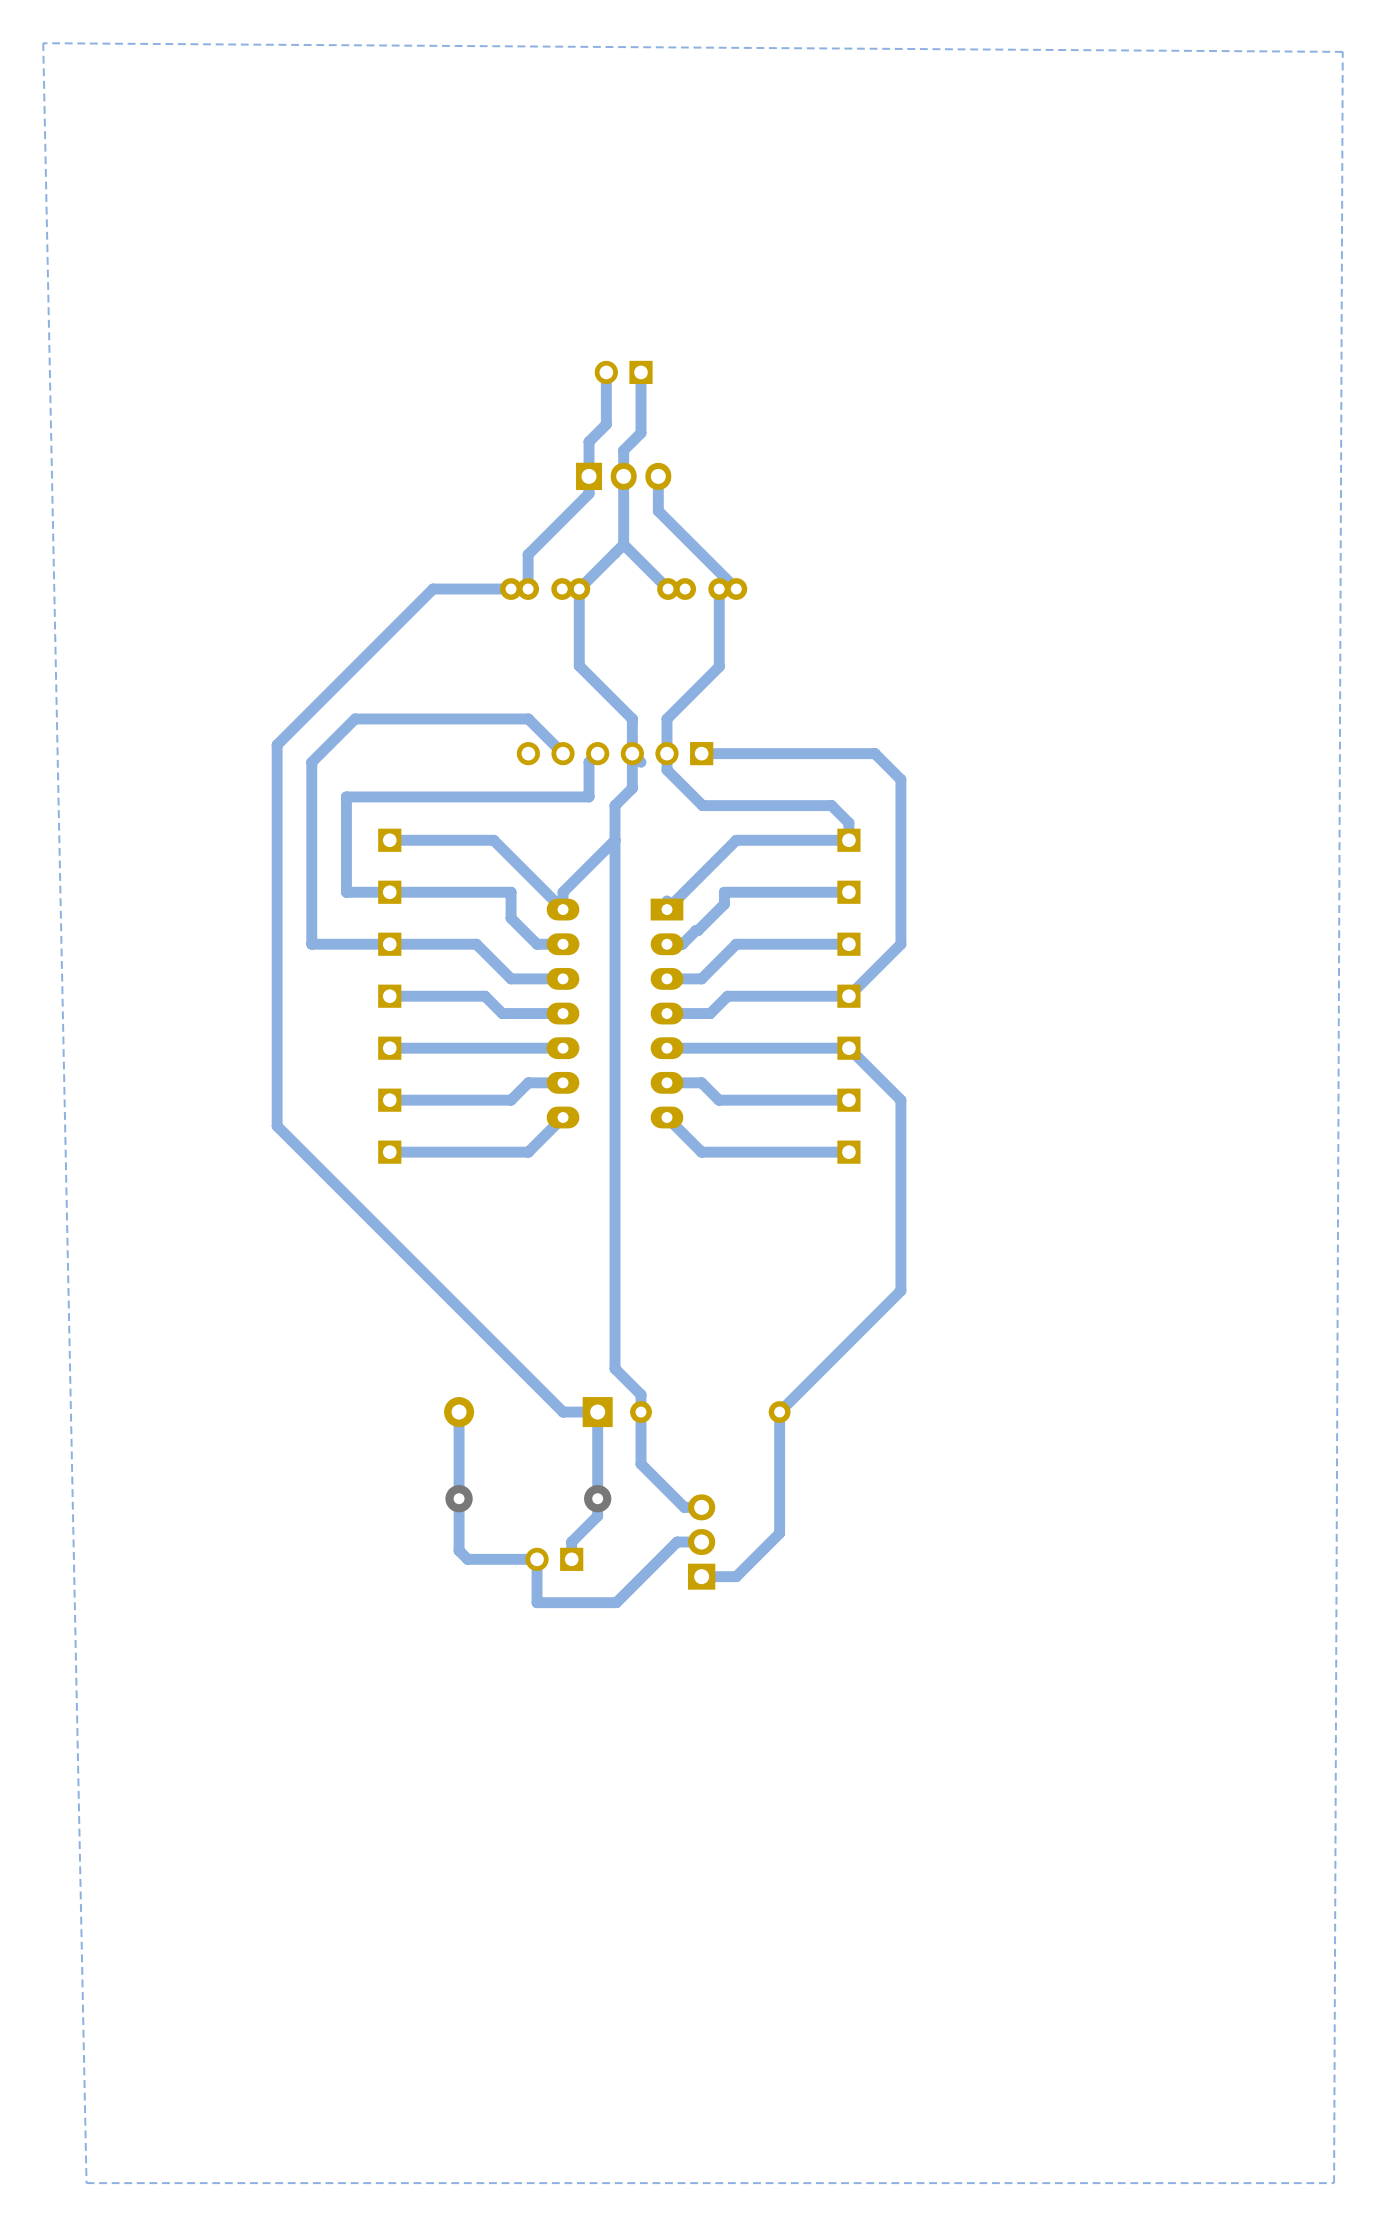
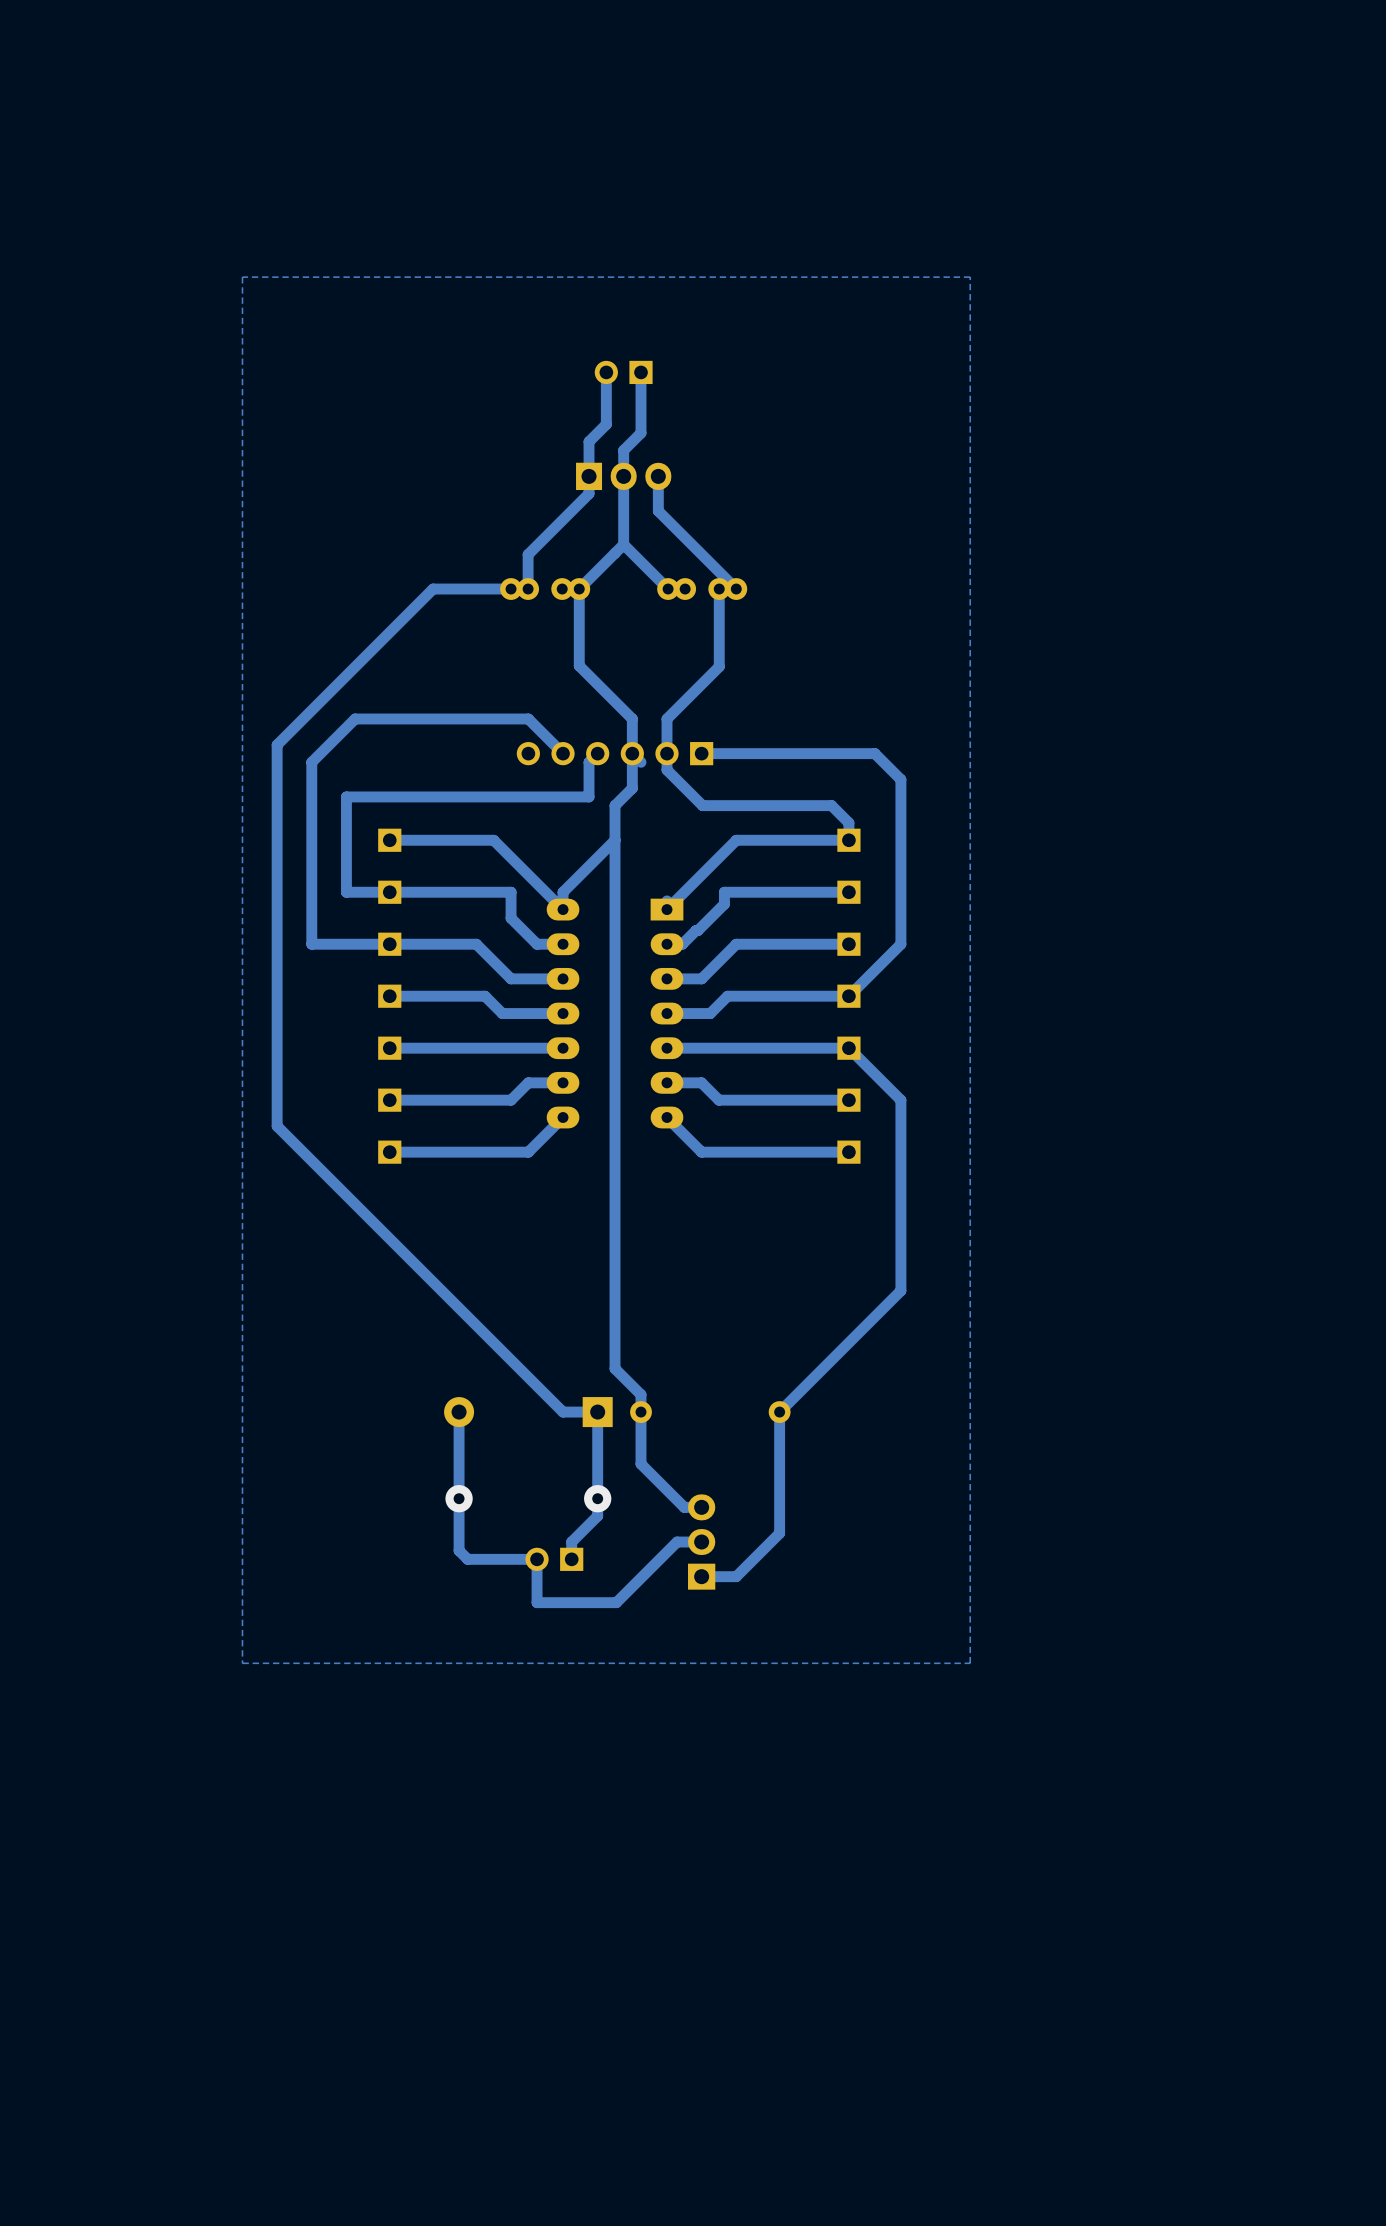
zone outline: (43, 43) (1342, 51) (1334, 2183) (86, 2183) (43, 43) -> none
zone outline: none -> (970, 277) (970, 1663) (242, 1663) (242, 277) (970, 277)

